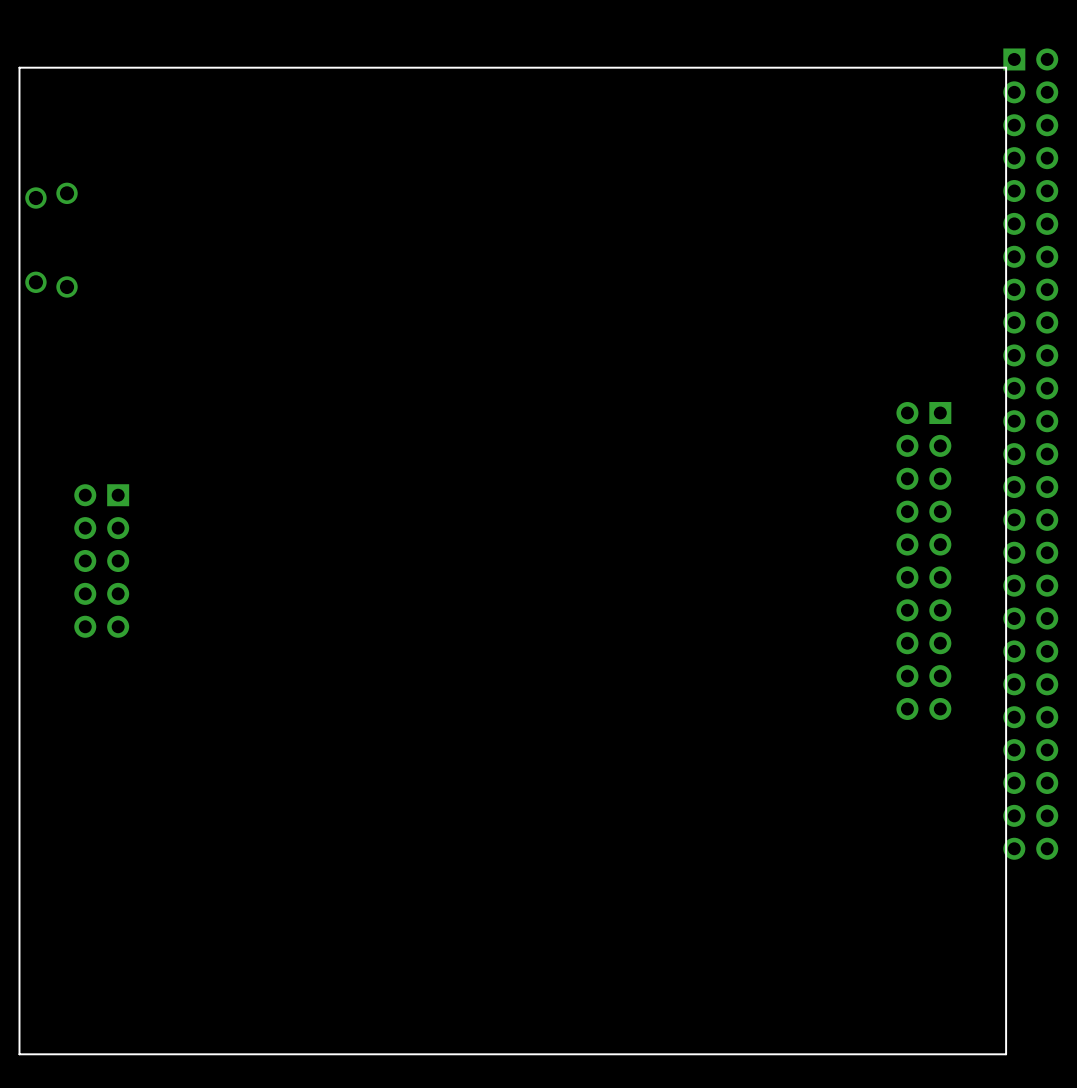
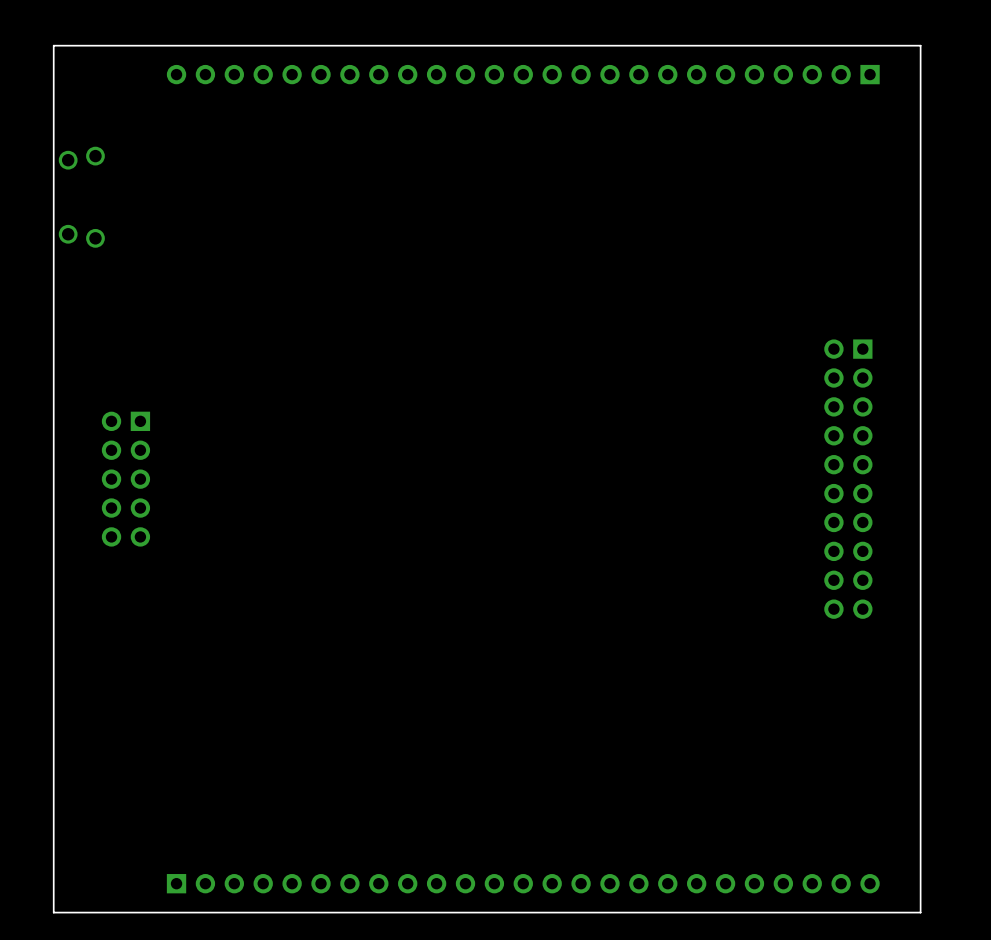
part: none -> (523, 74)
part: (1030, 454) -> none
part: none -> (523, 883)

